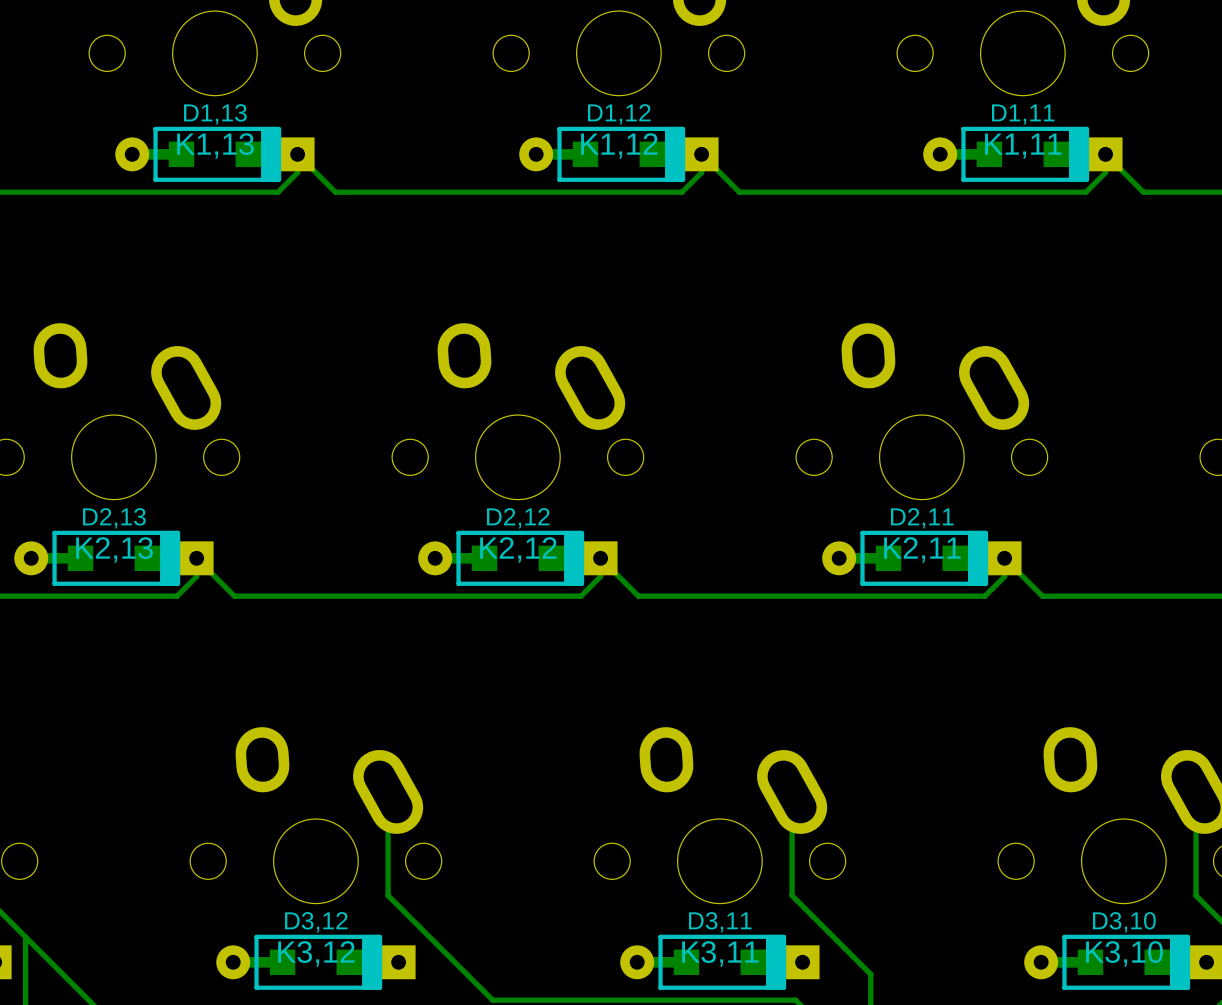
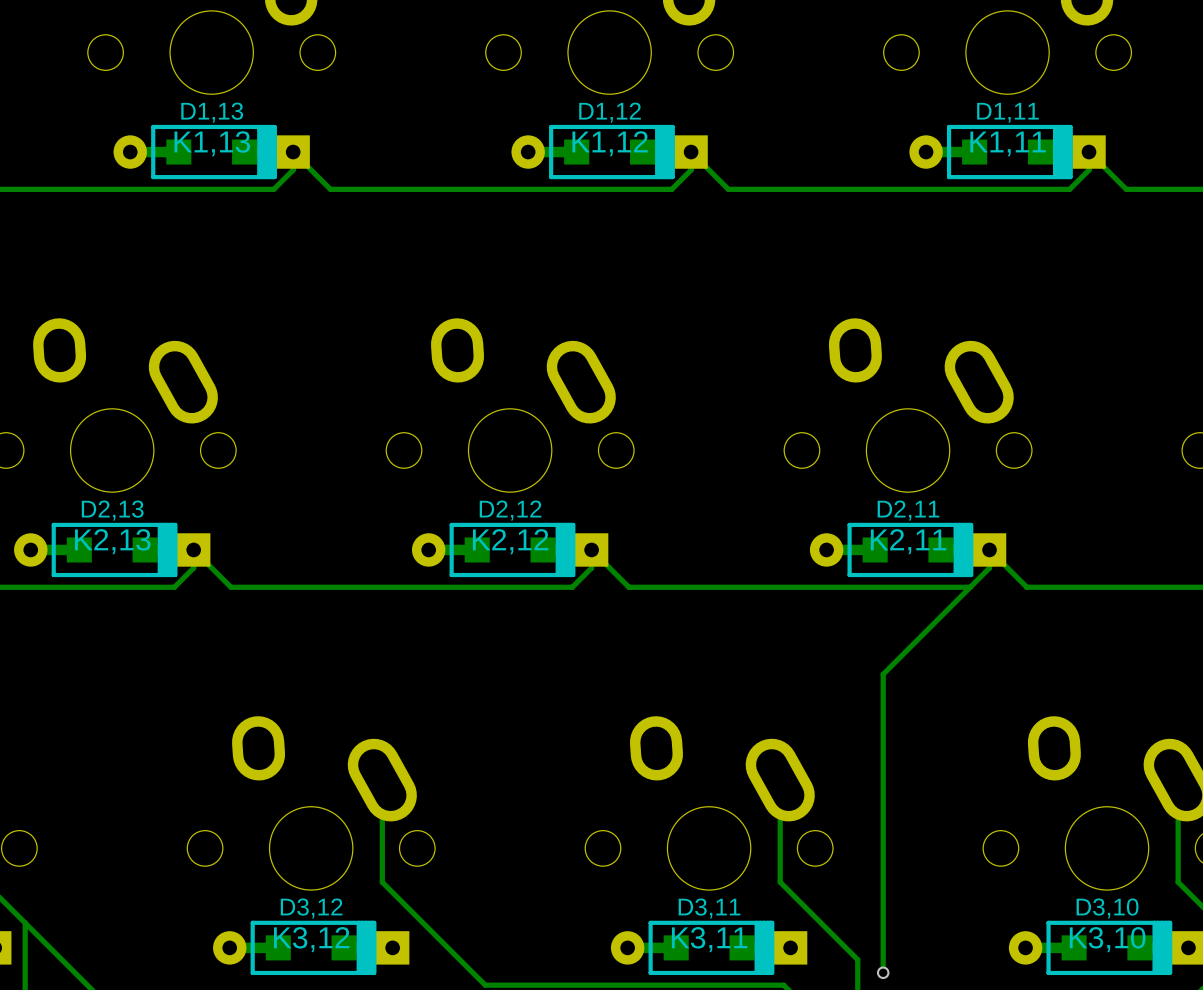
track: none -> (970, 587) (883, 674) (883, 972)
via: none -> (883, 972)

